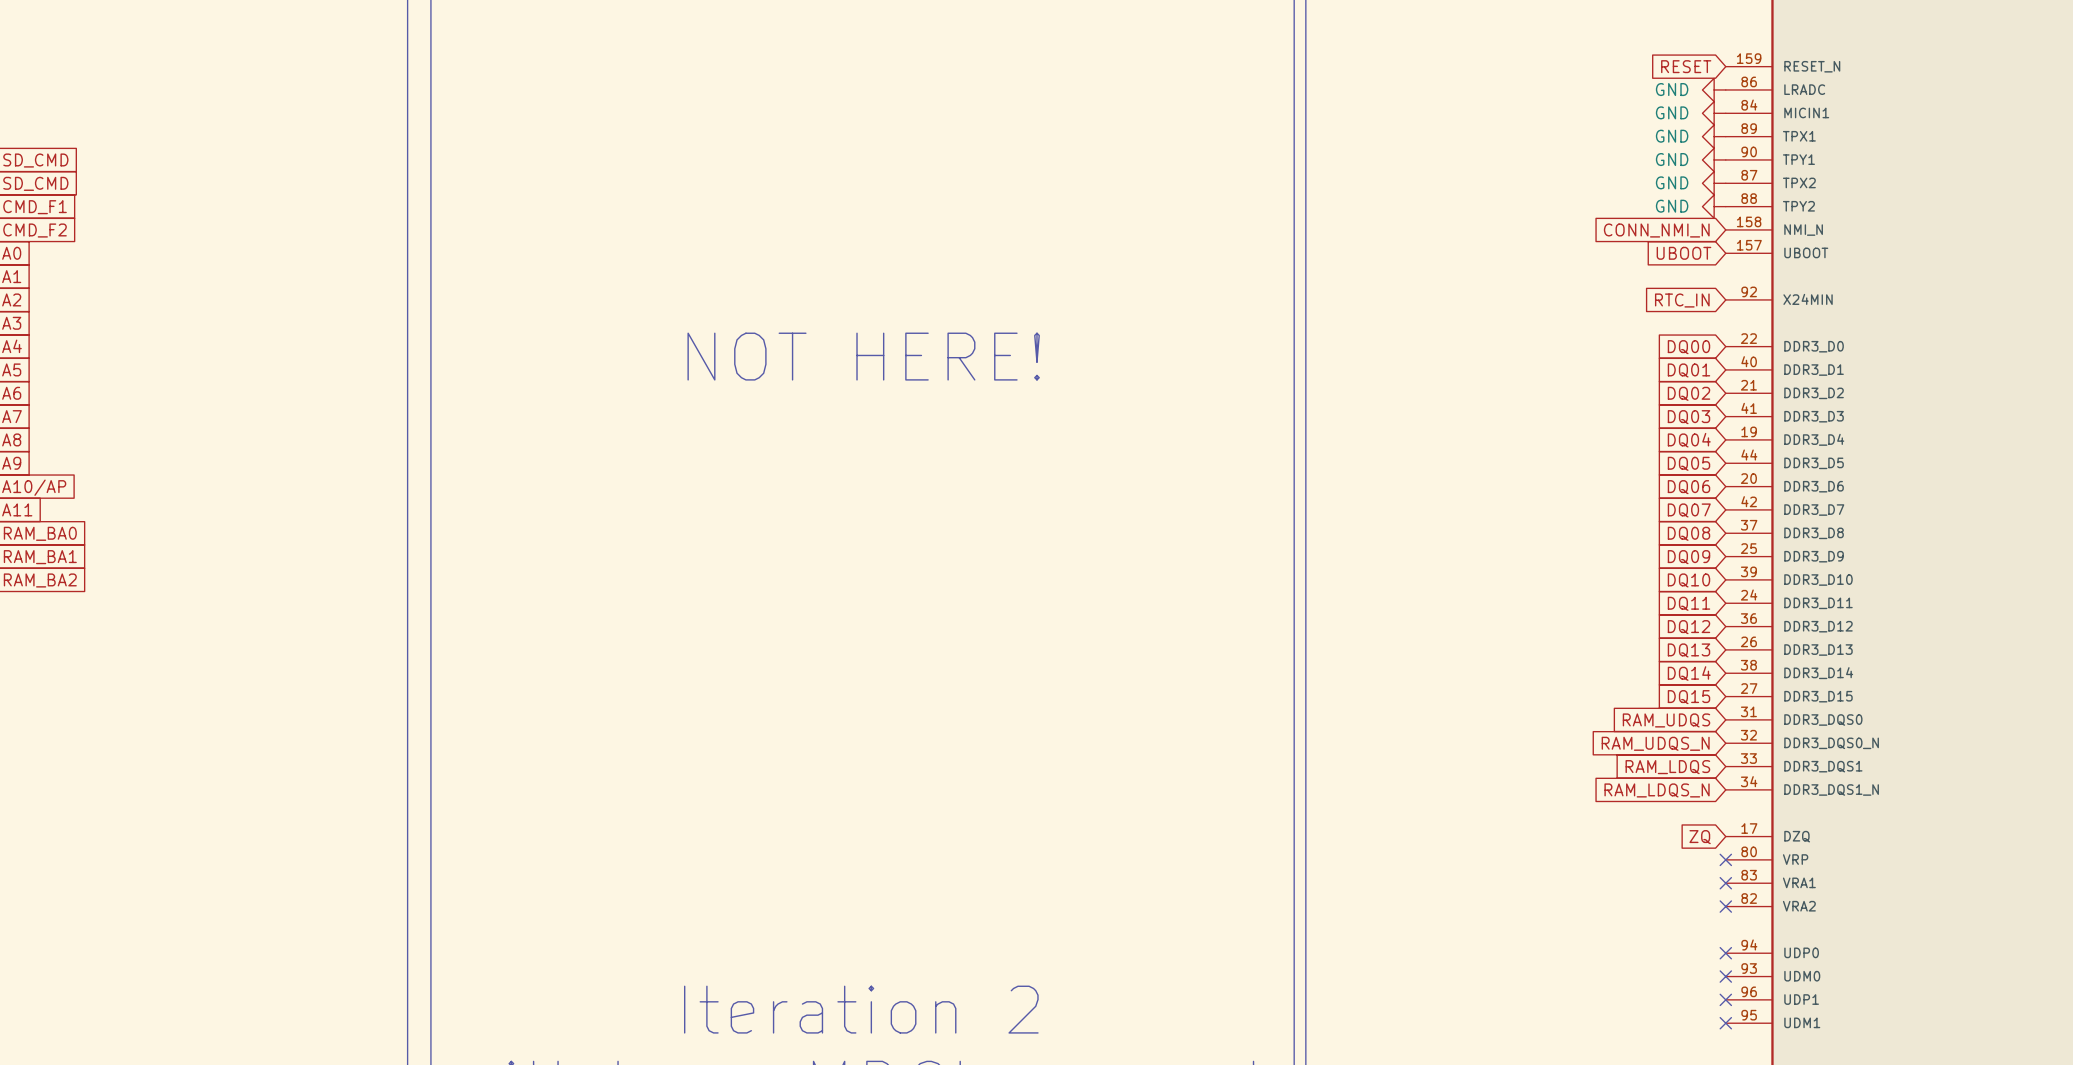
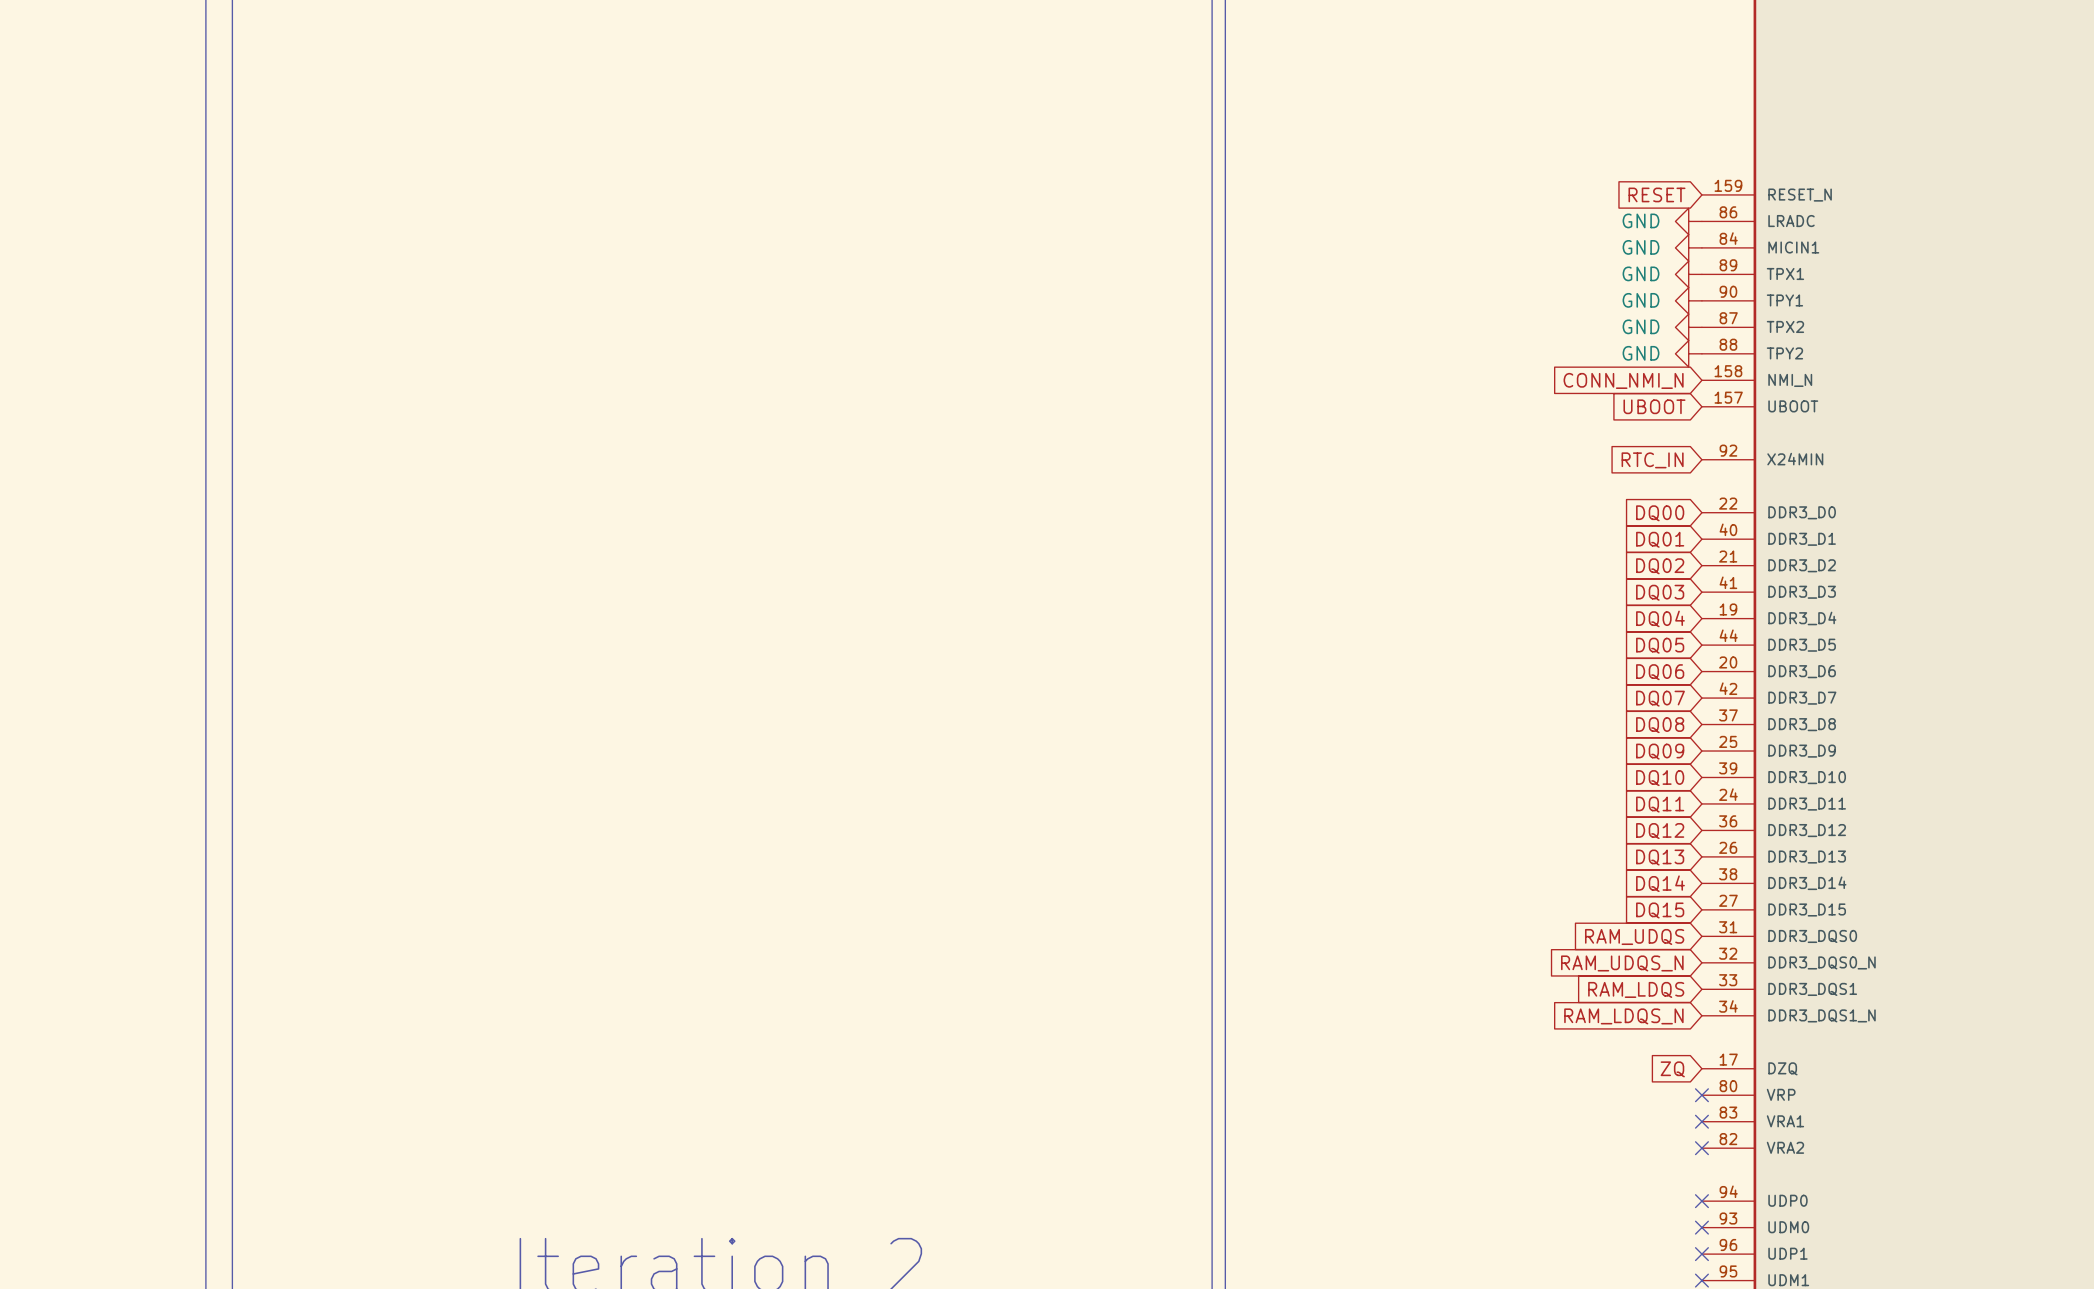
text: NOT HERE! (863, 356) -> none

